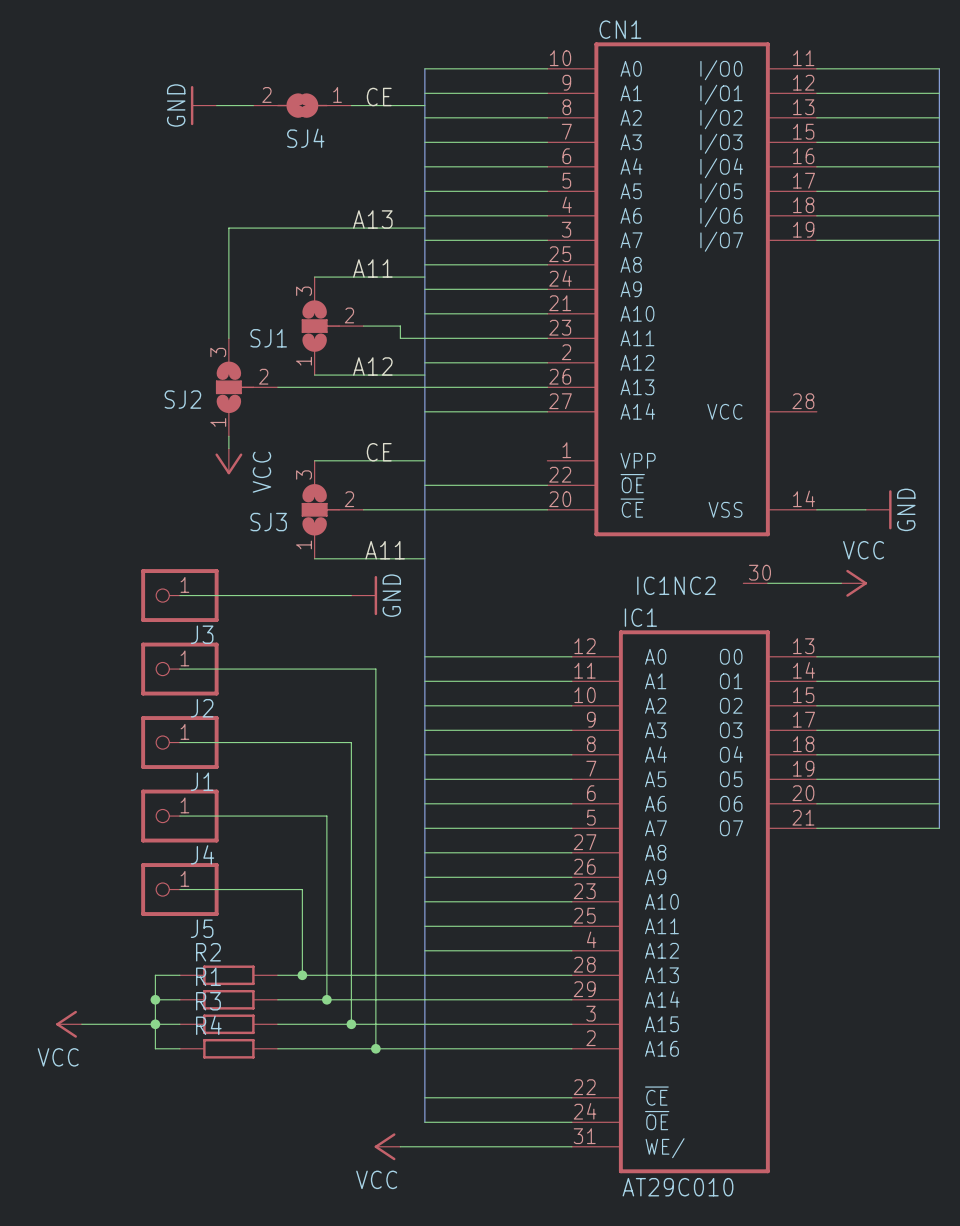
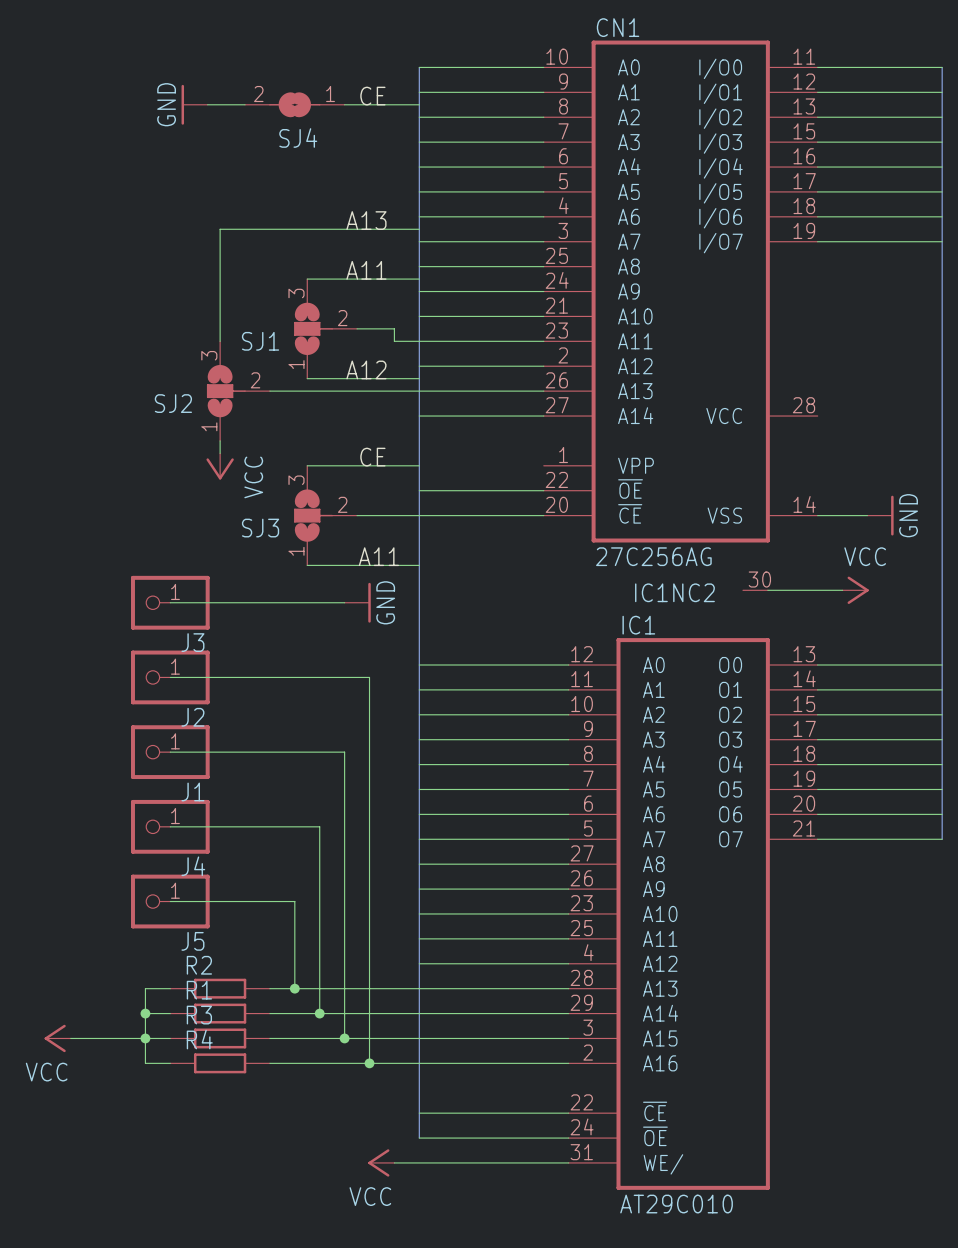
CN1 value: none -> 27C256AG (653, 556)

